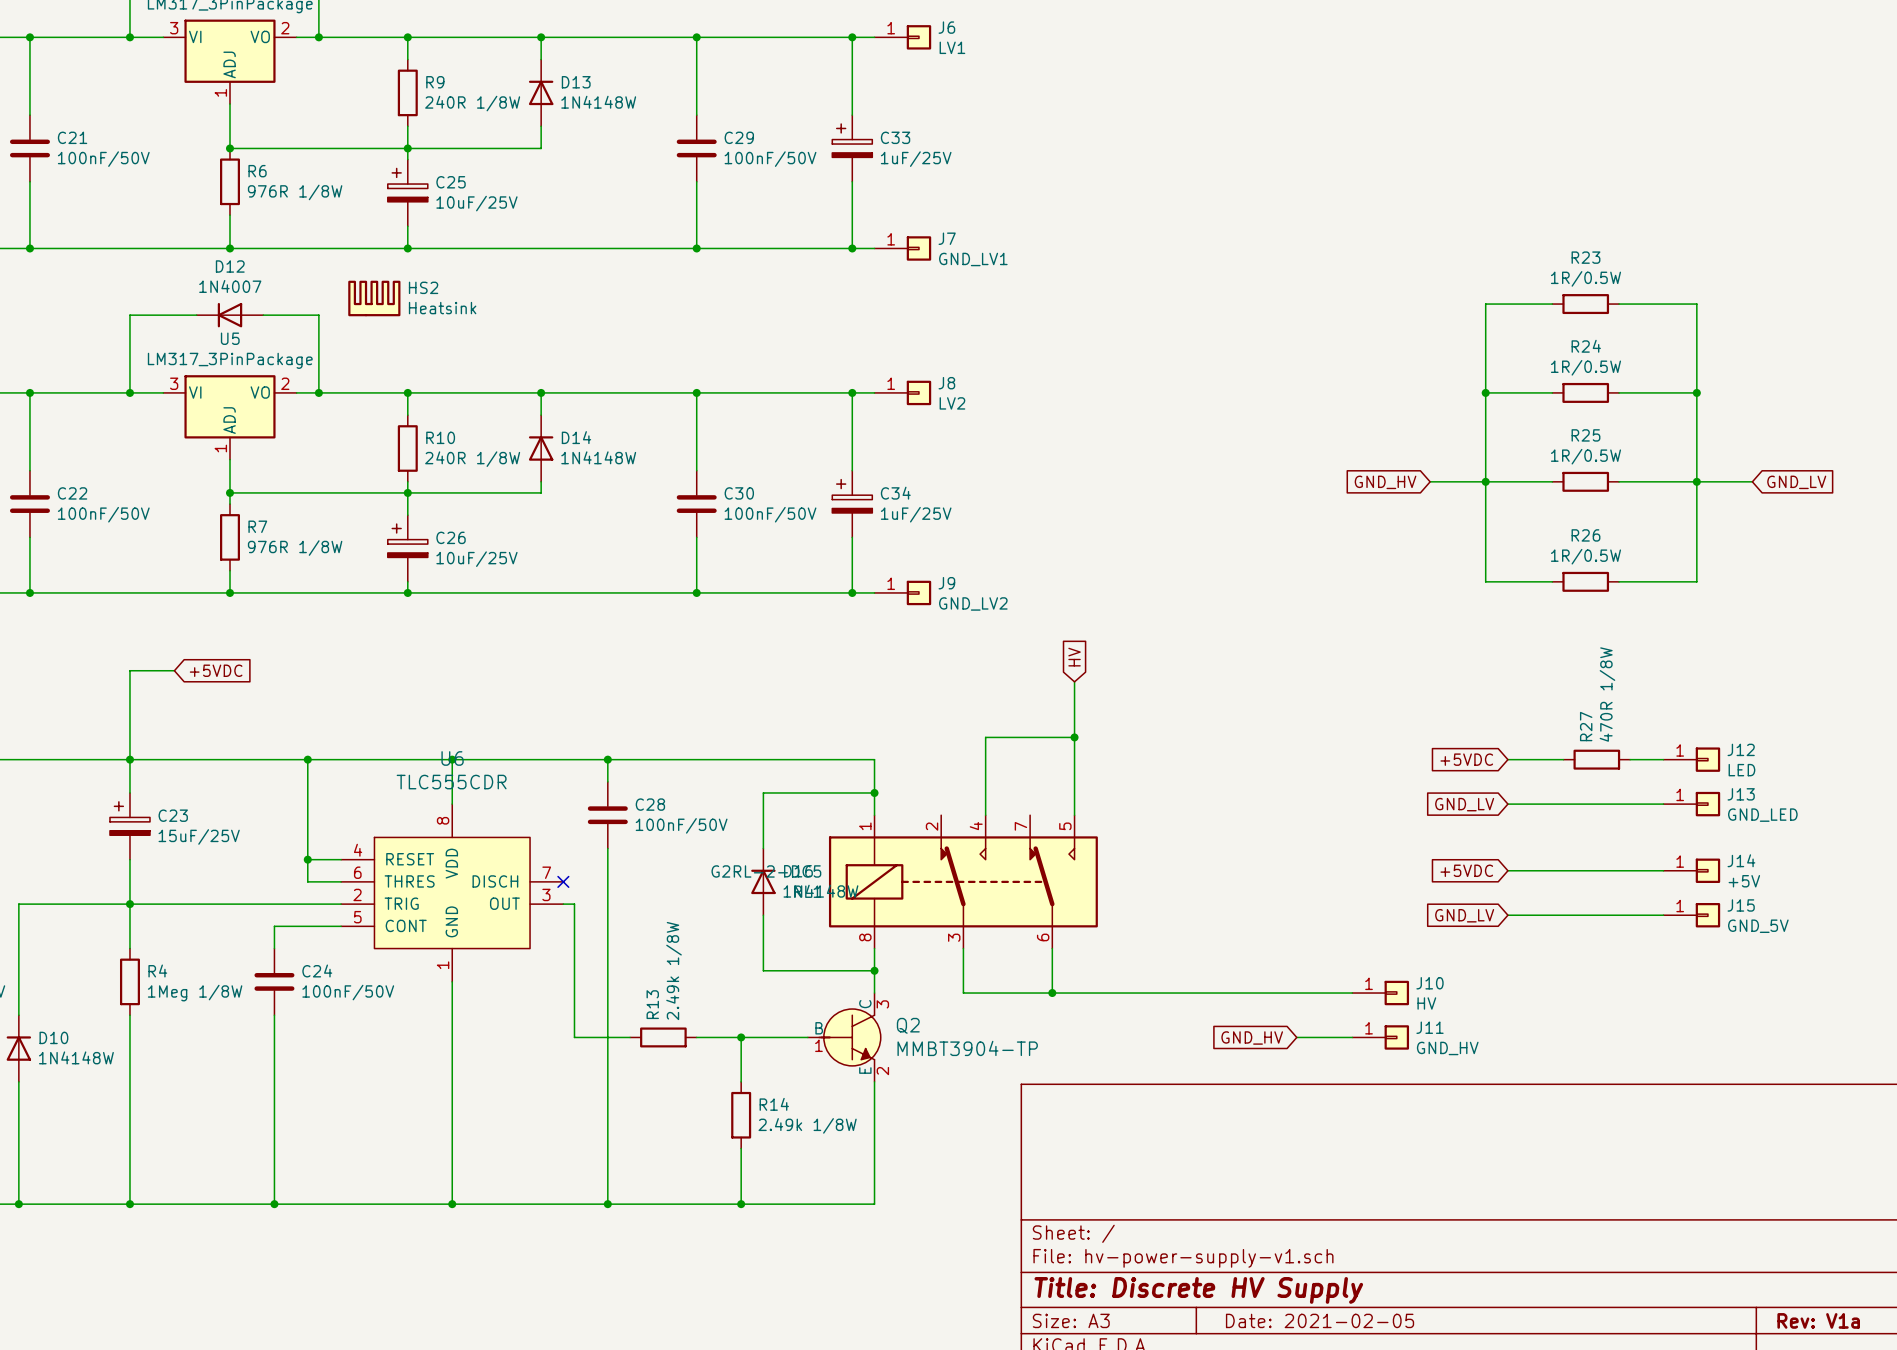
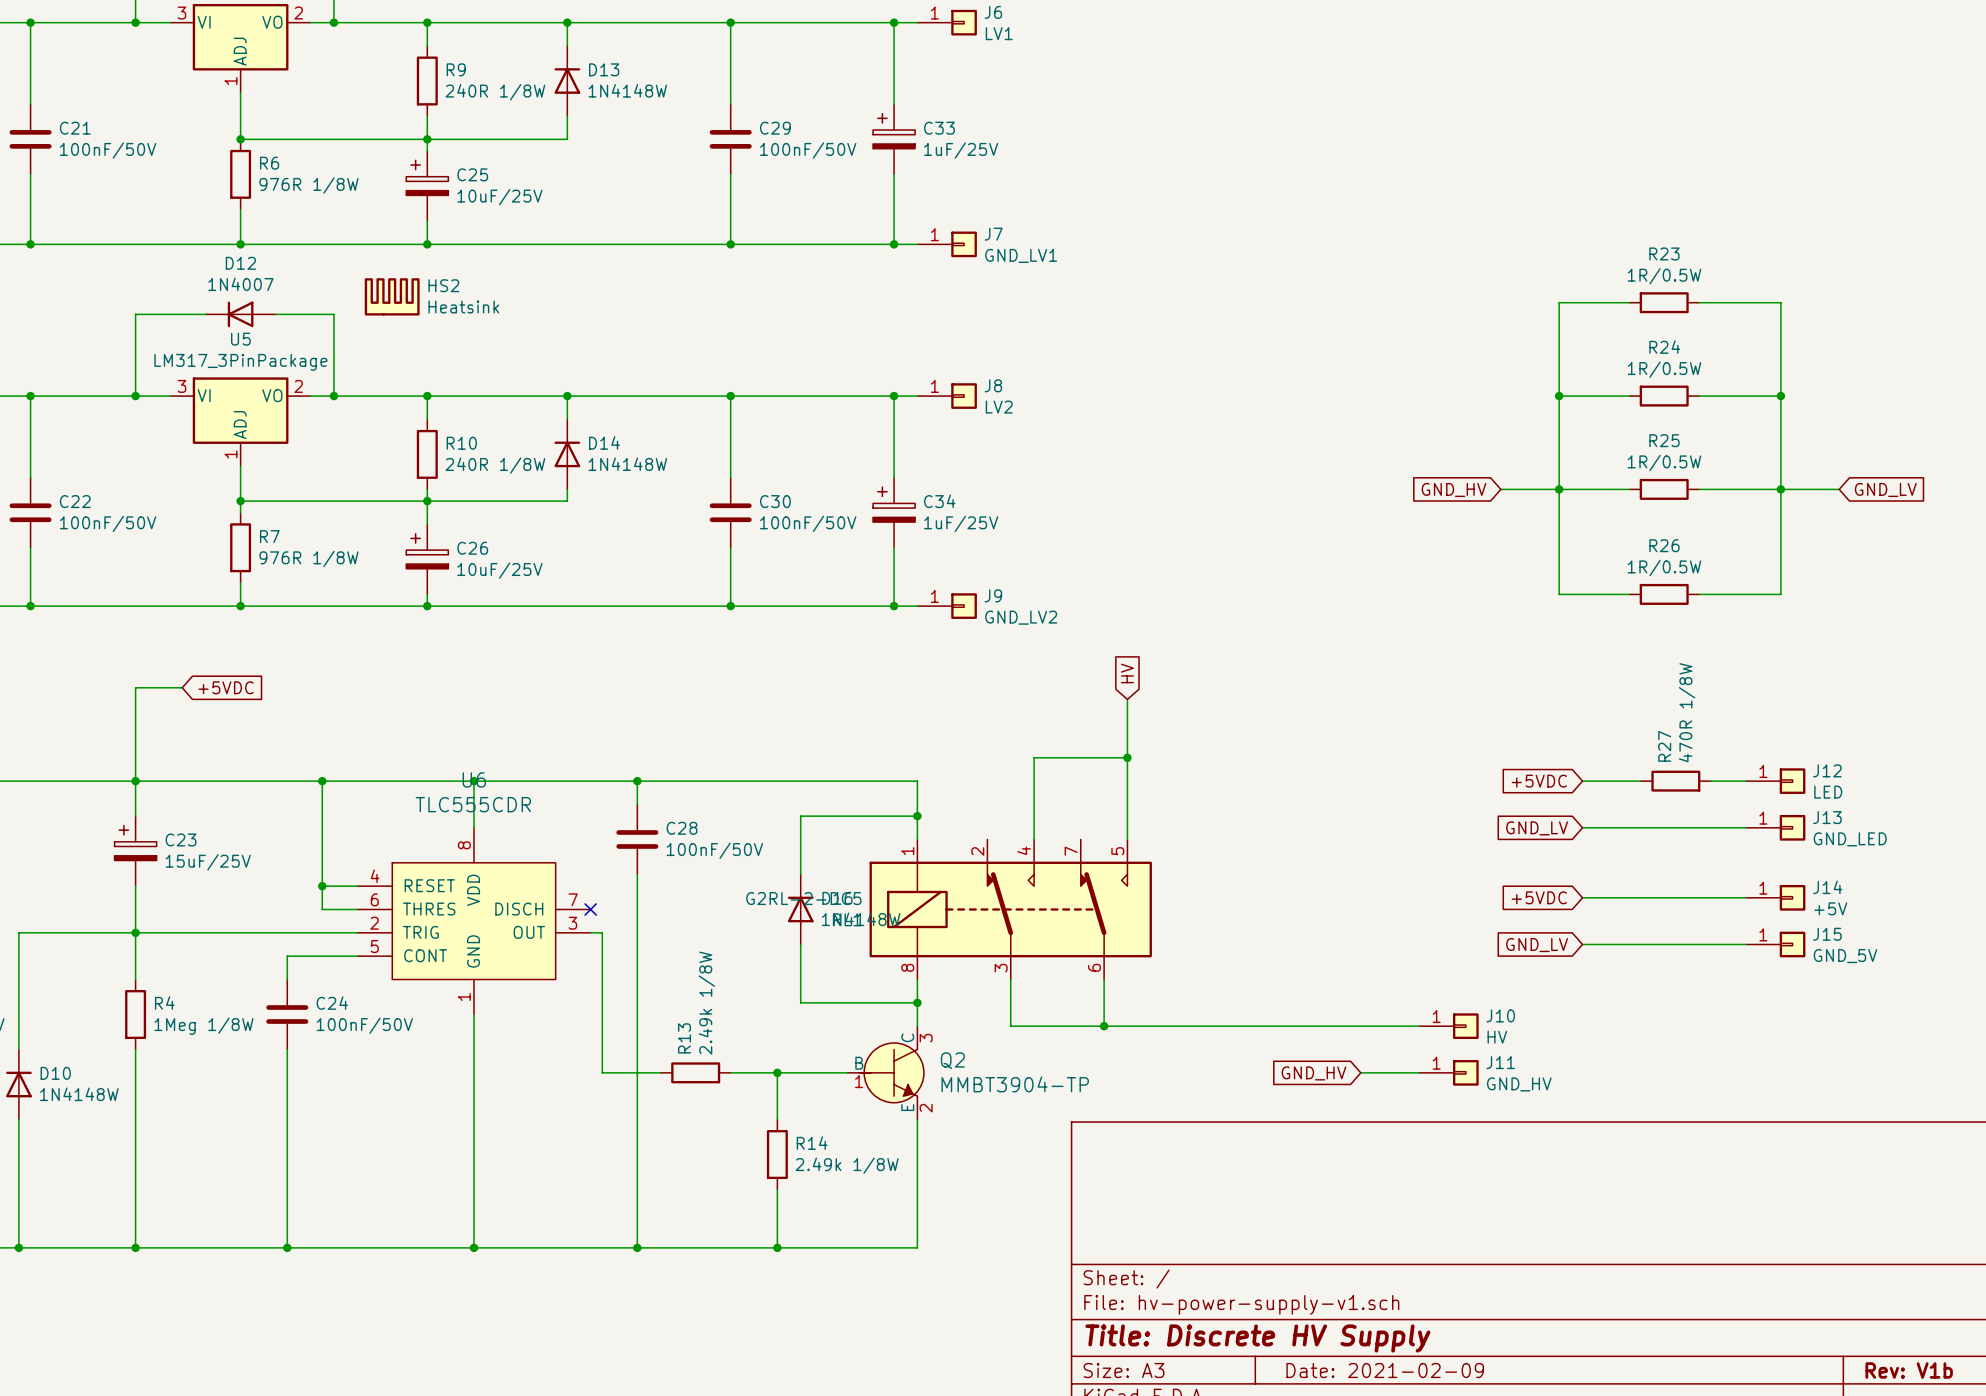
title block: Date: 2021-02-05 (1320, 1320) -> Date: 2021-02-09 (1385, 1370)
title block: Rev: V1a (1818, 1320) -> Rev: V1b (1909, 1370)

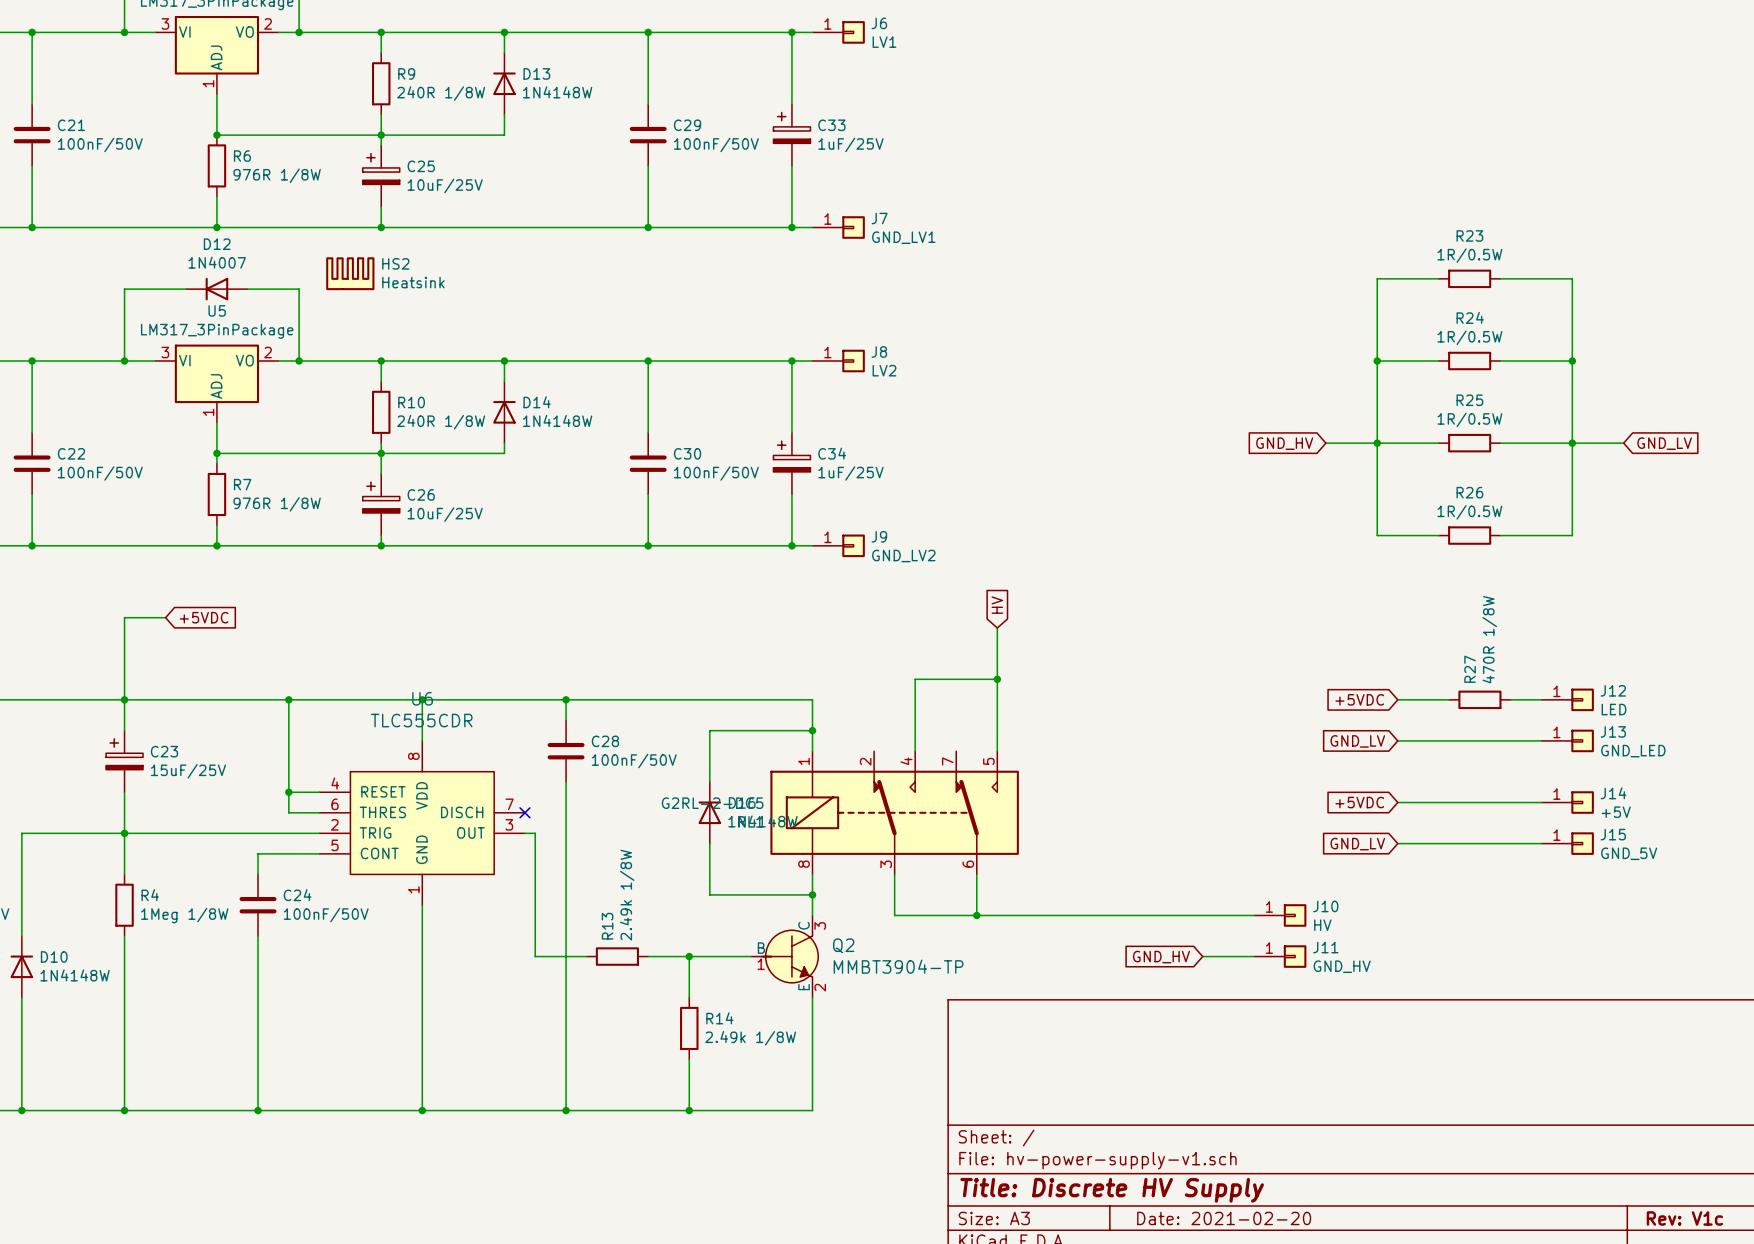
title block: Date: 2021-02-09 (1385, 1370) -> Date: 2021-02-20 (1224, 1218)
title block: Rev: V1b (1909, 1370) -> Rev: V1c (1684, 1218)

